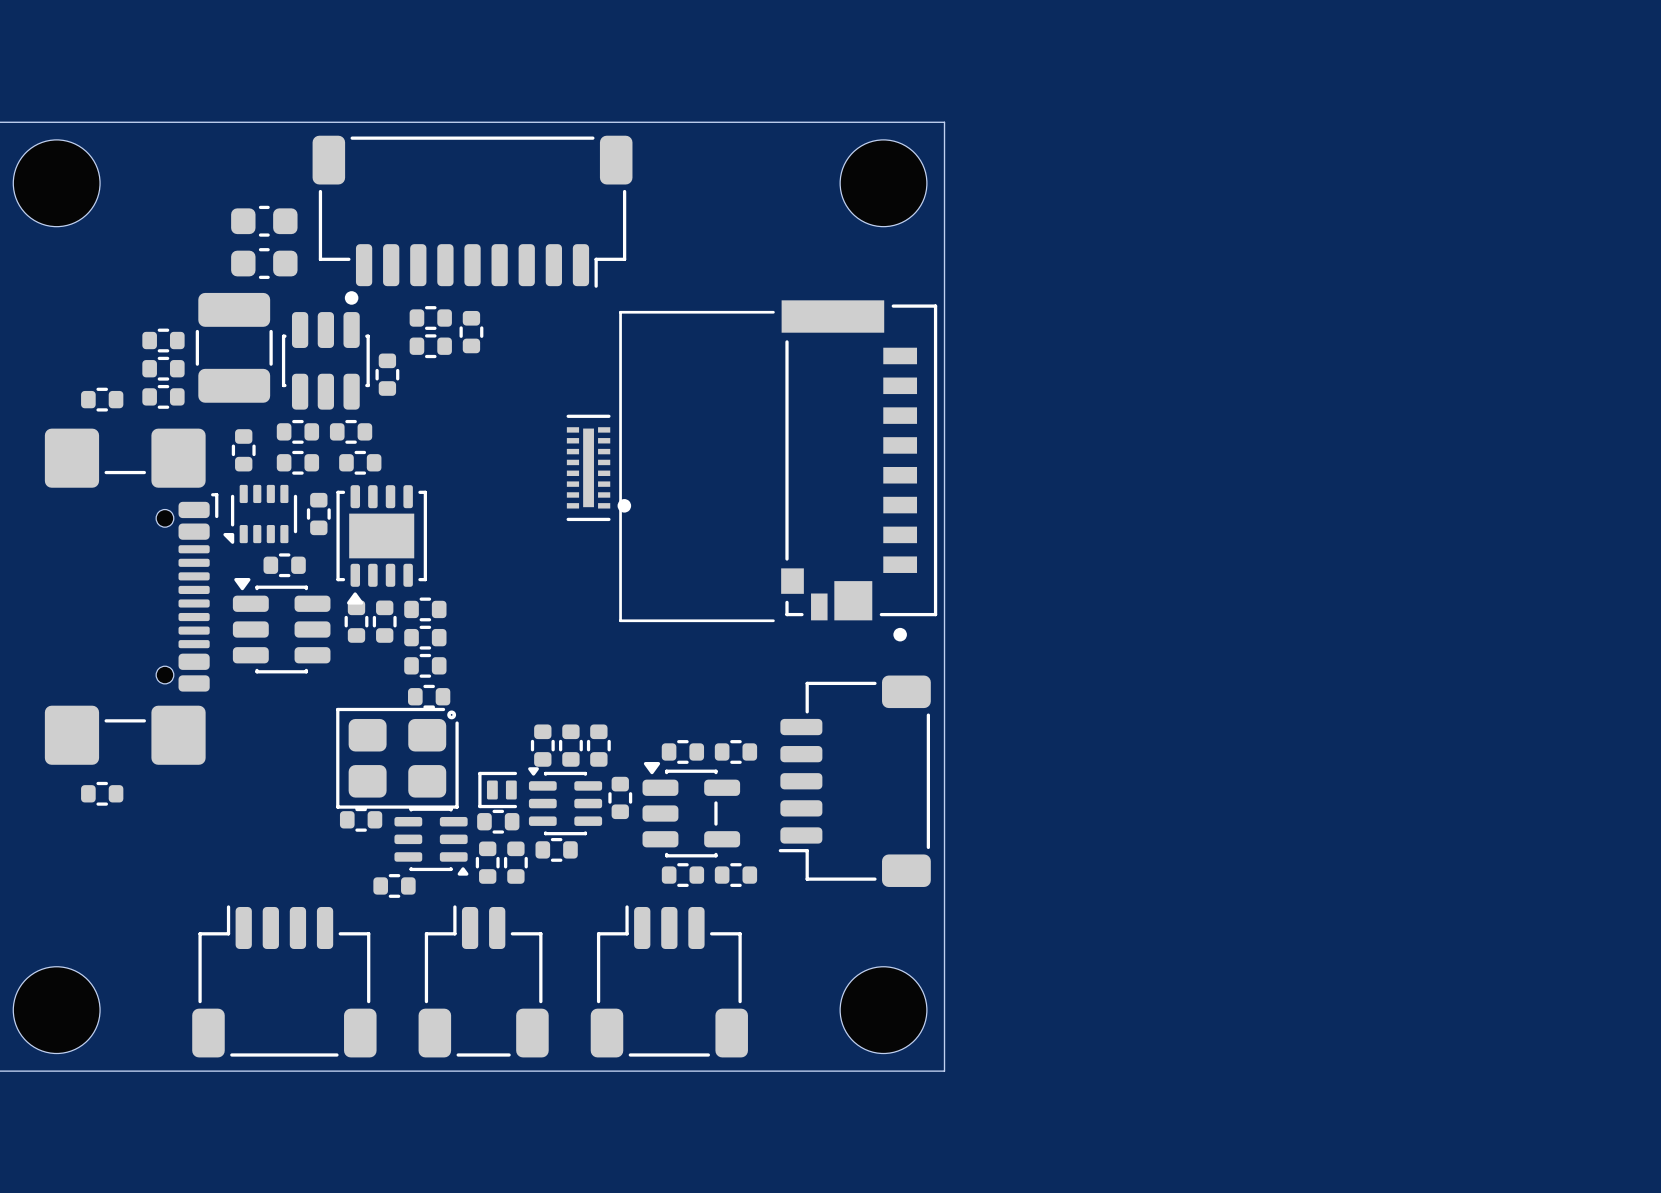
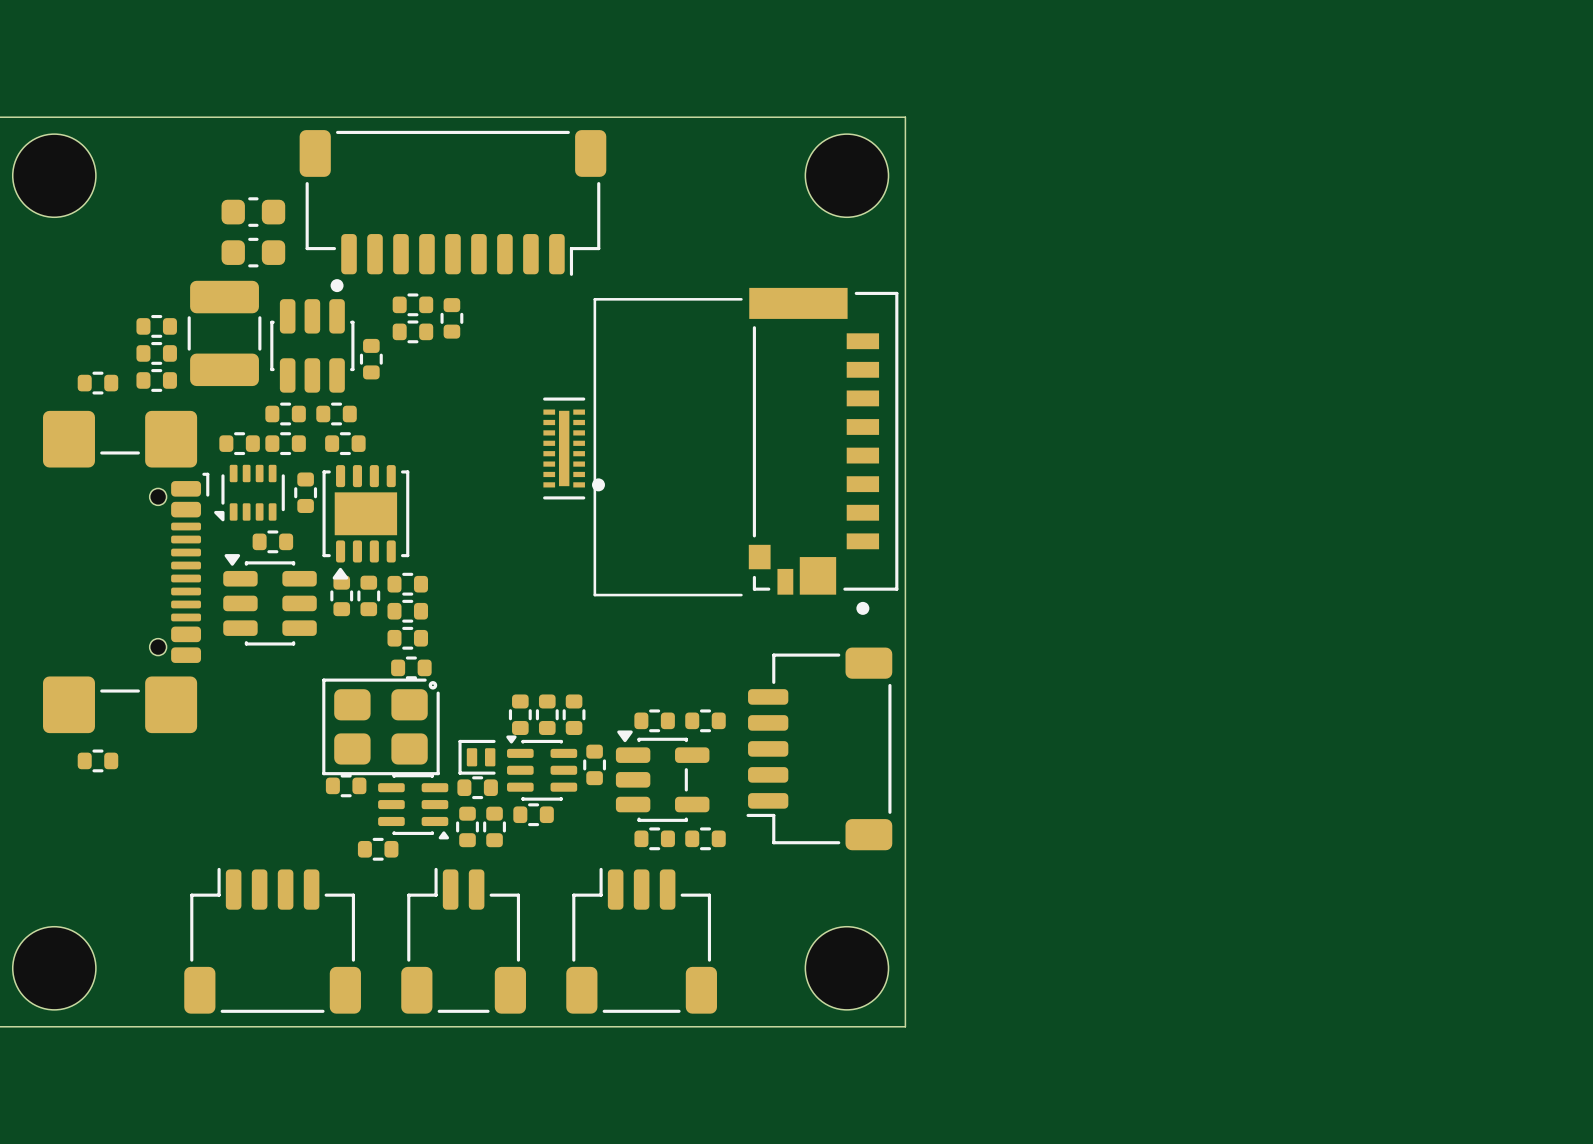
part rotation: 0° (243, 450) -> 90° clockwise (239, 443)

